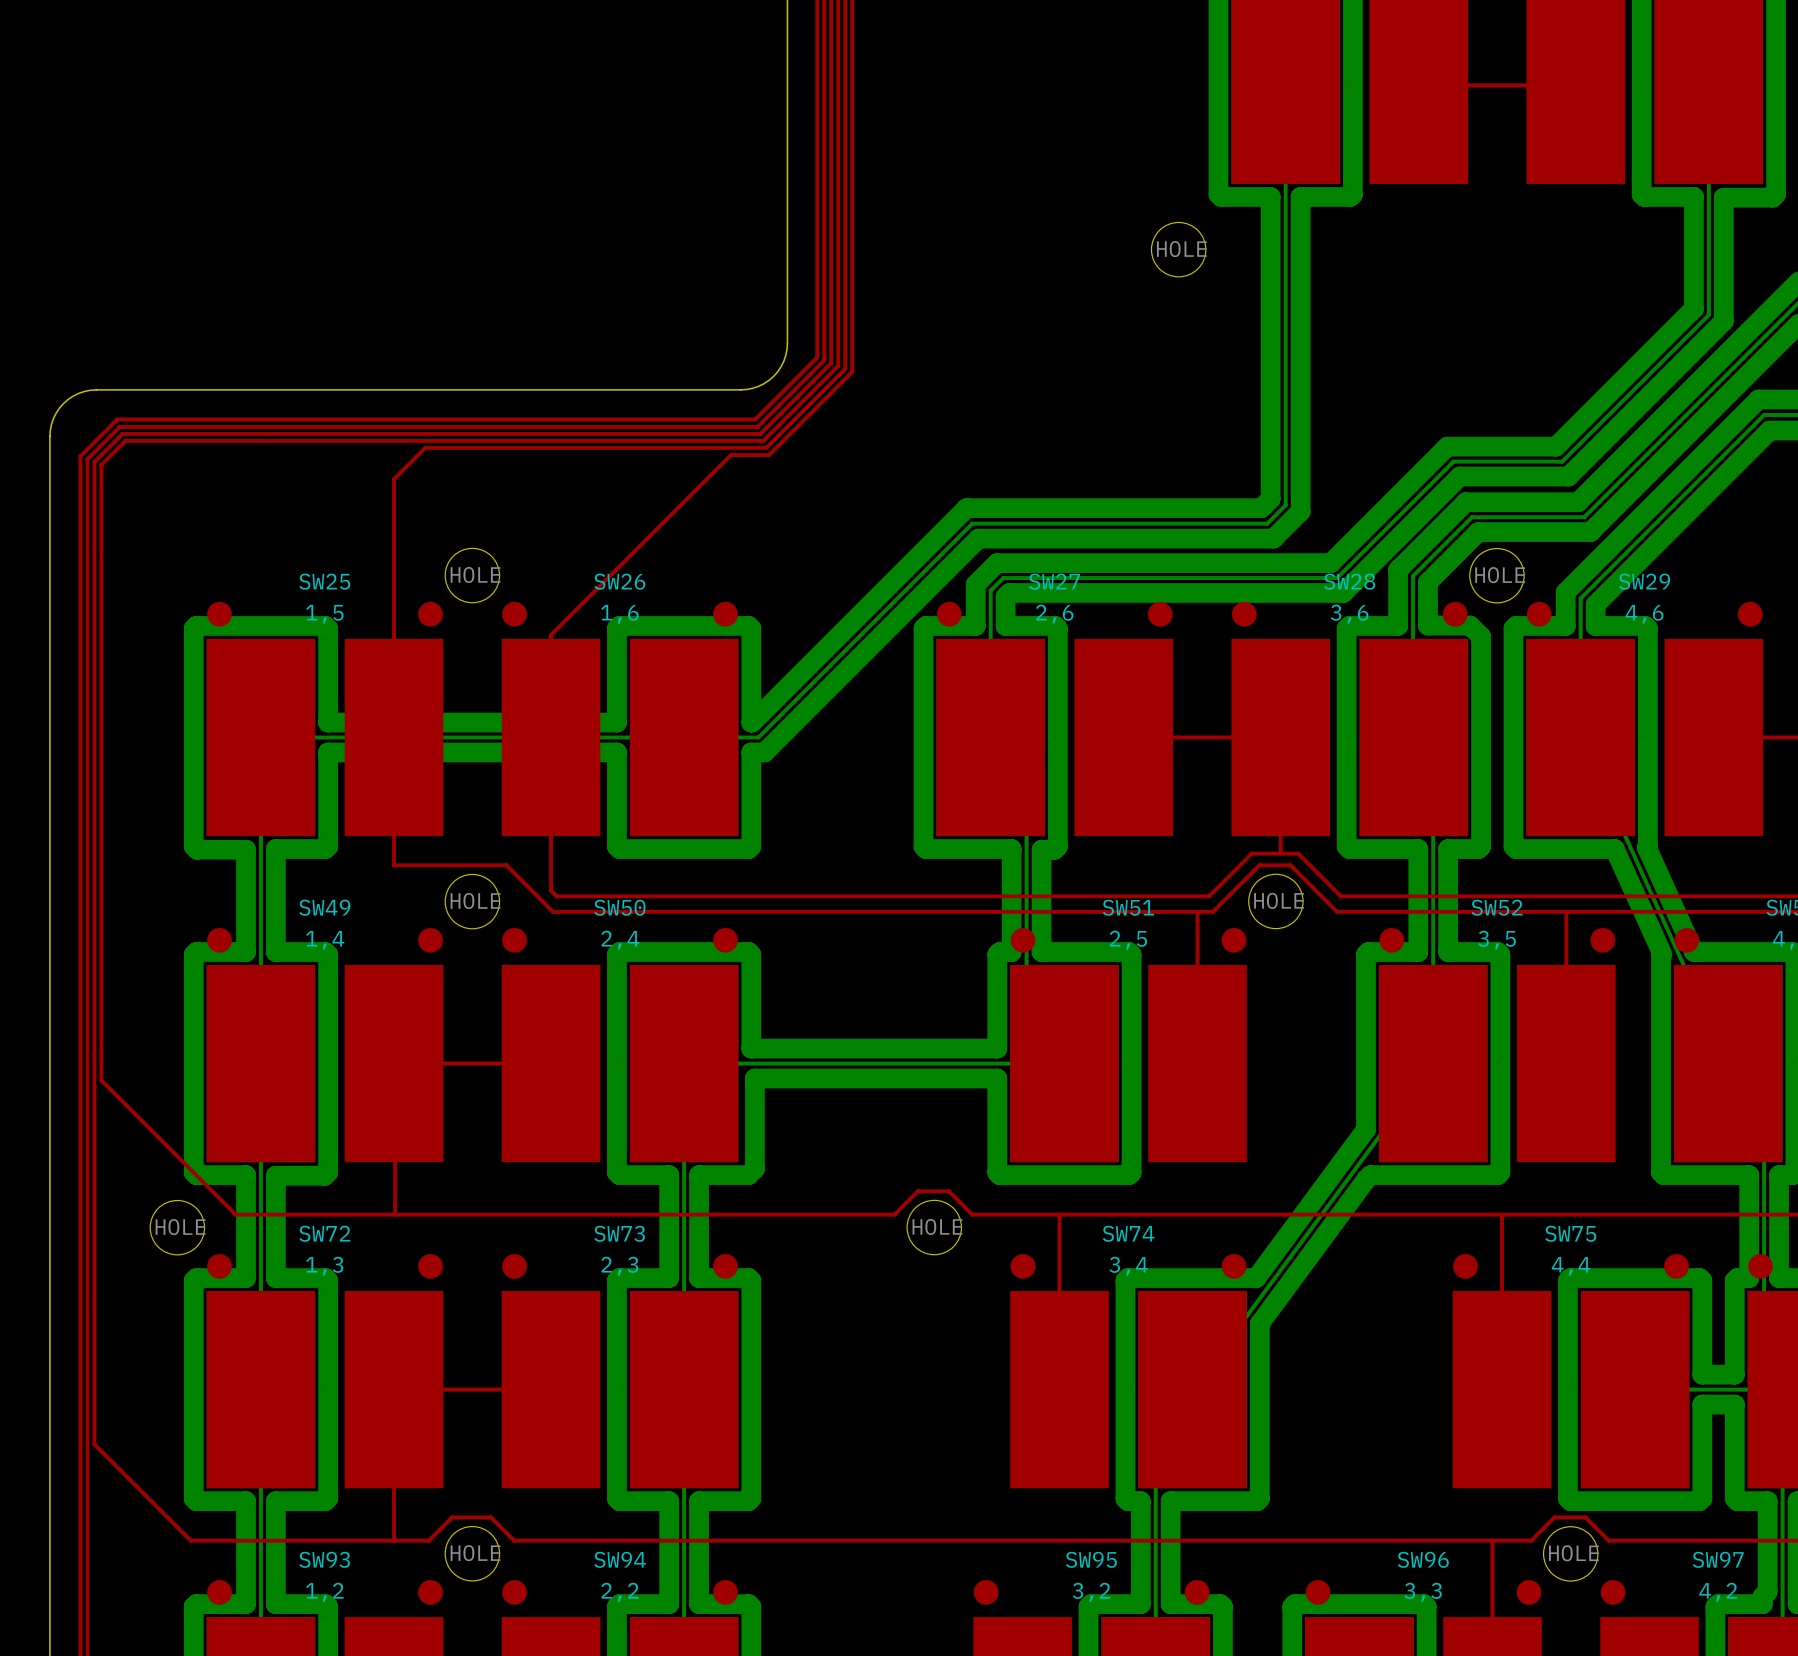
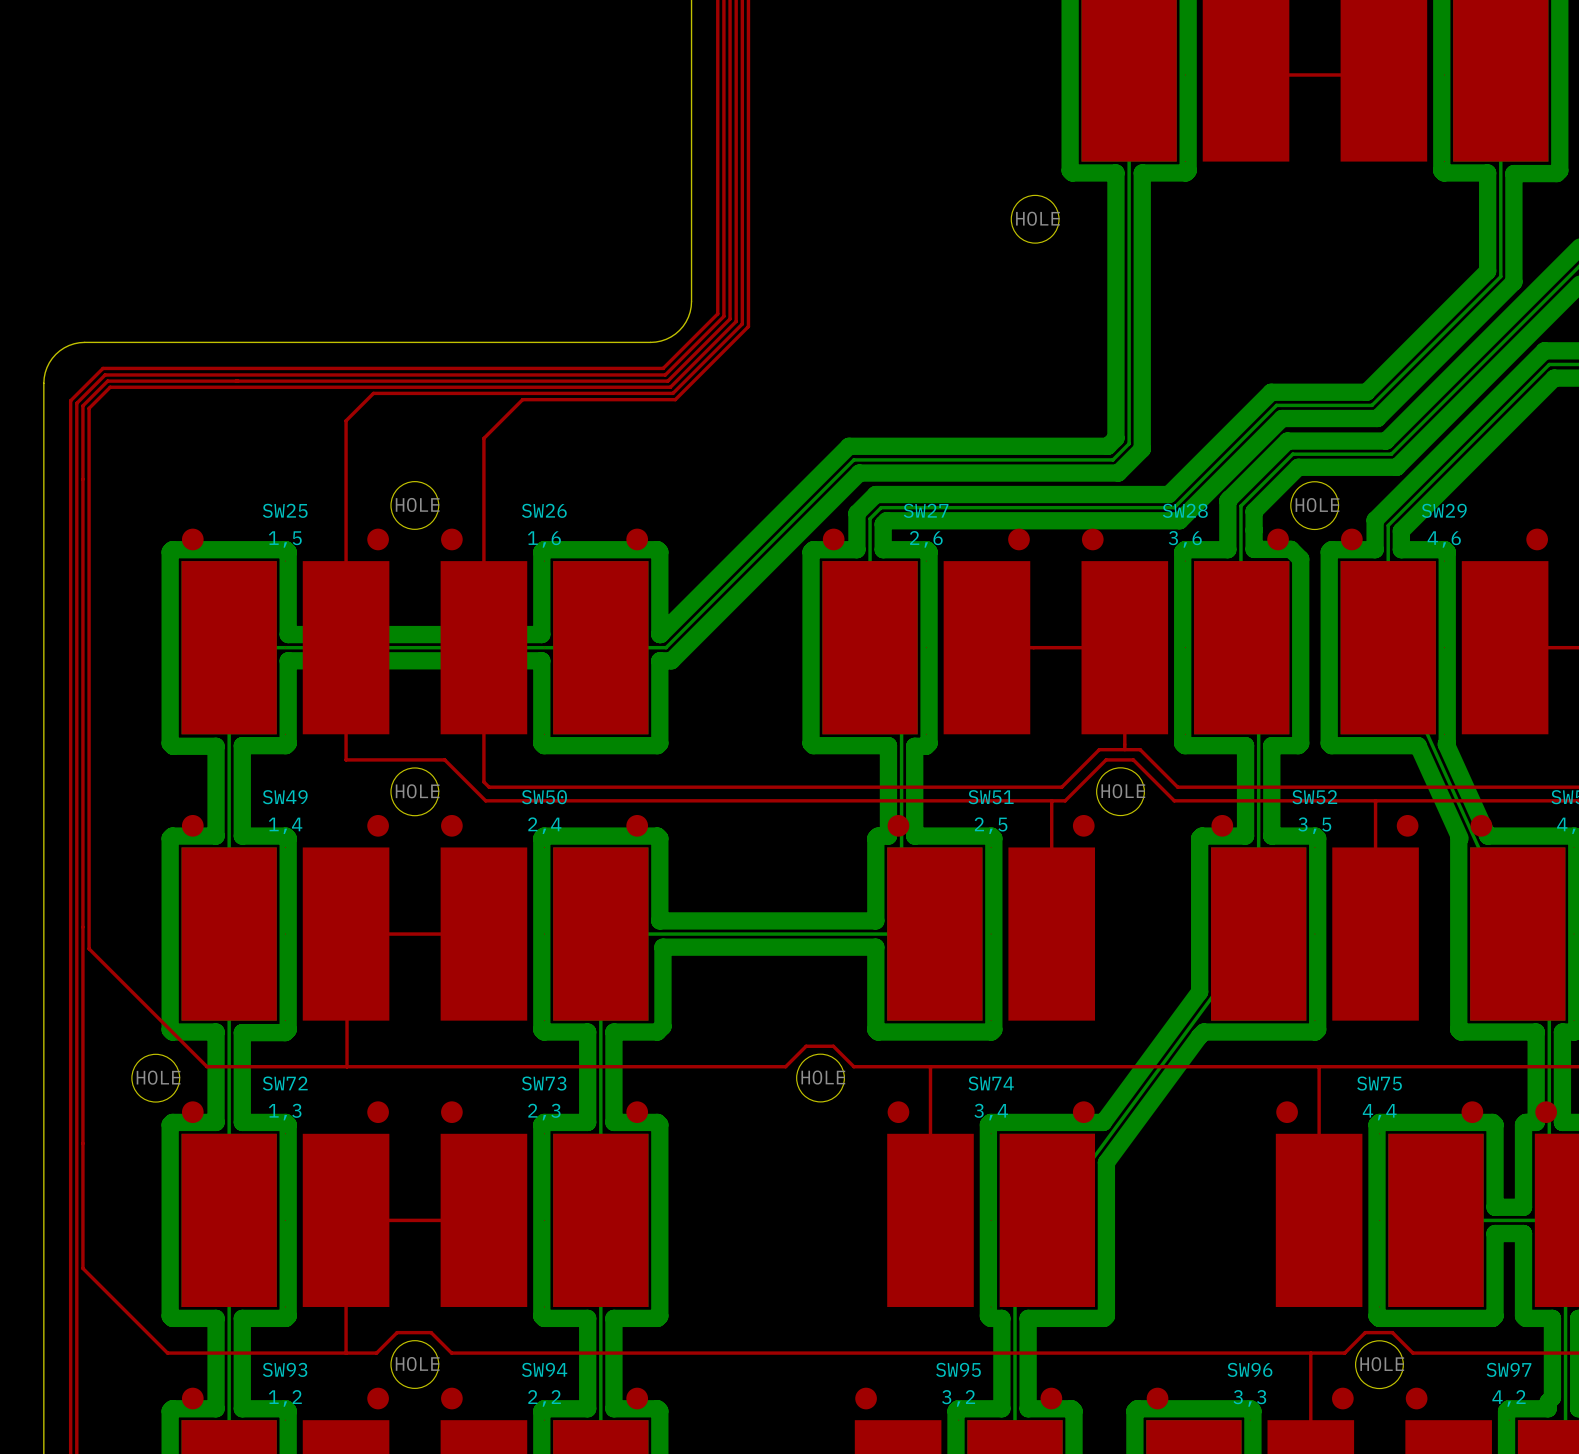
top track: (730, 455) (551, 635) -> (641, 399) (522, 399) (483, 438) (483, 557)

